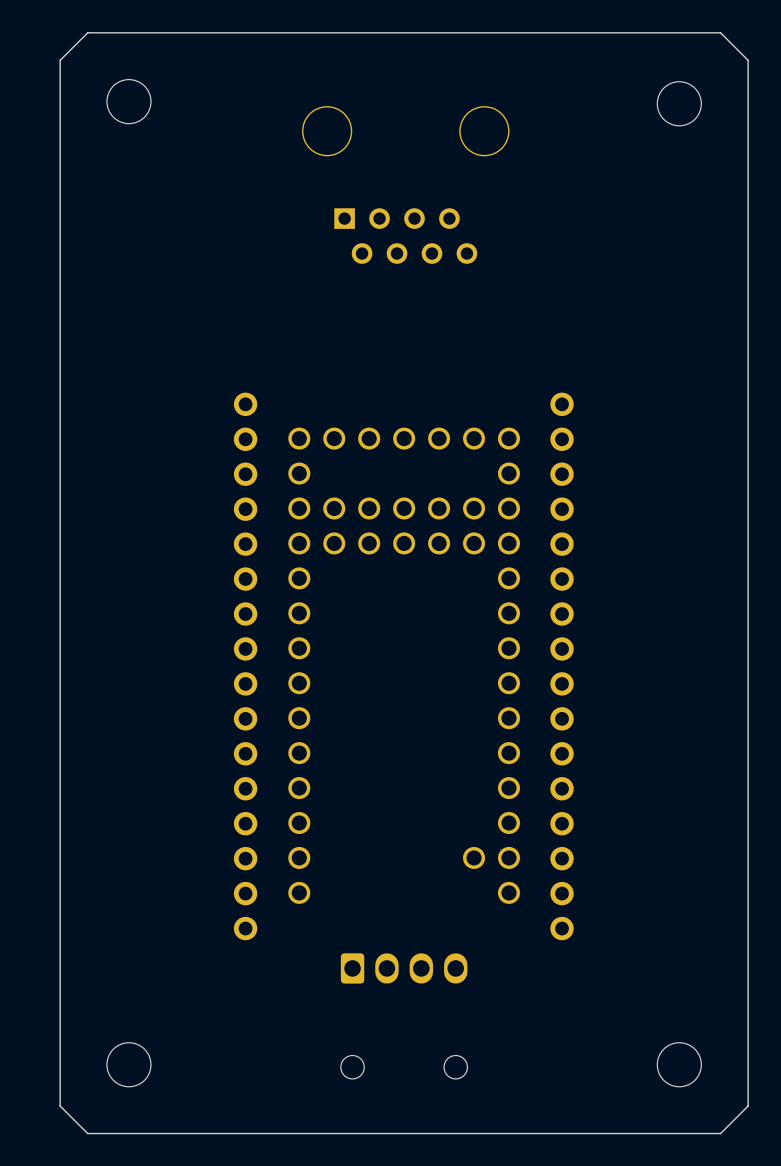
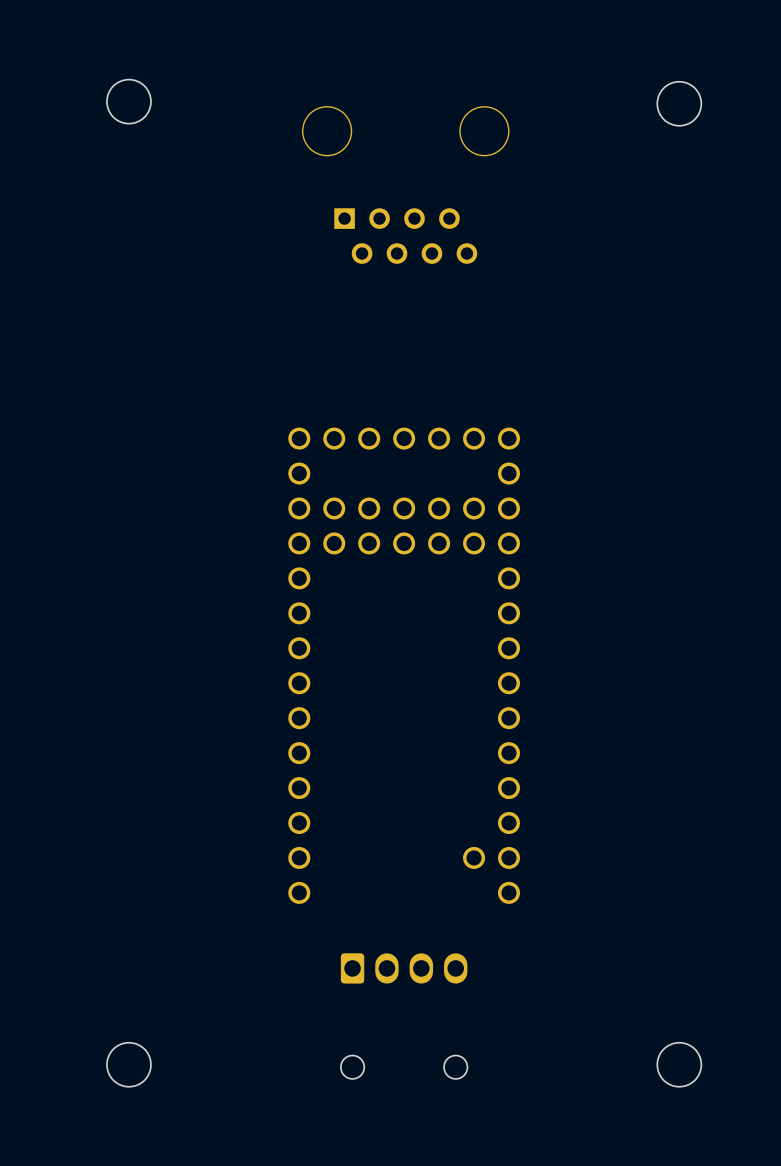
board edge: (720, 32) (748, 60) (748, 1106) (720, 1133) (87, 1133) (60, 1106) (60, 60) (87, 32) (720, 32) -> none
part: (245, 666) -> none
part: (562, 666) -> none

